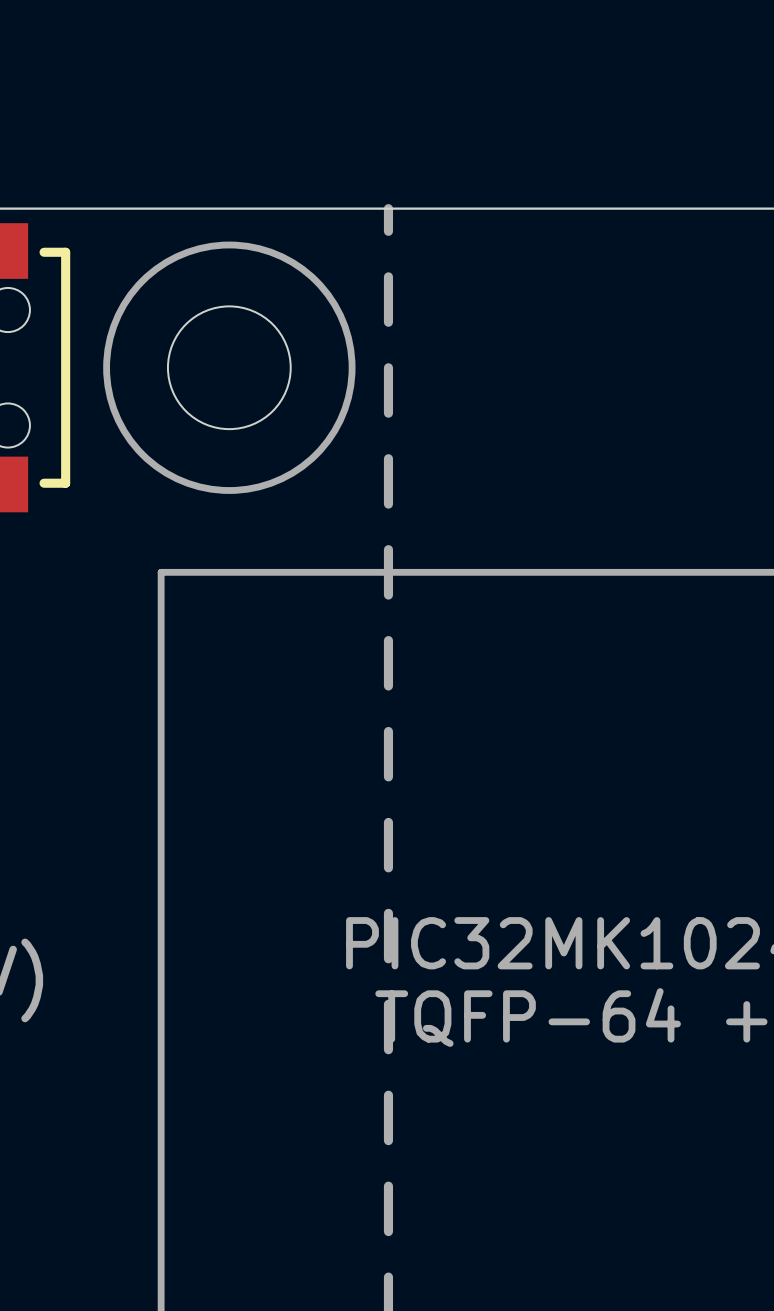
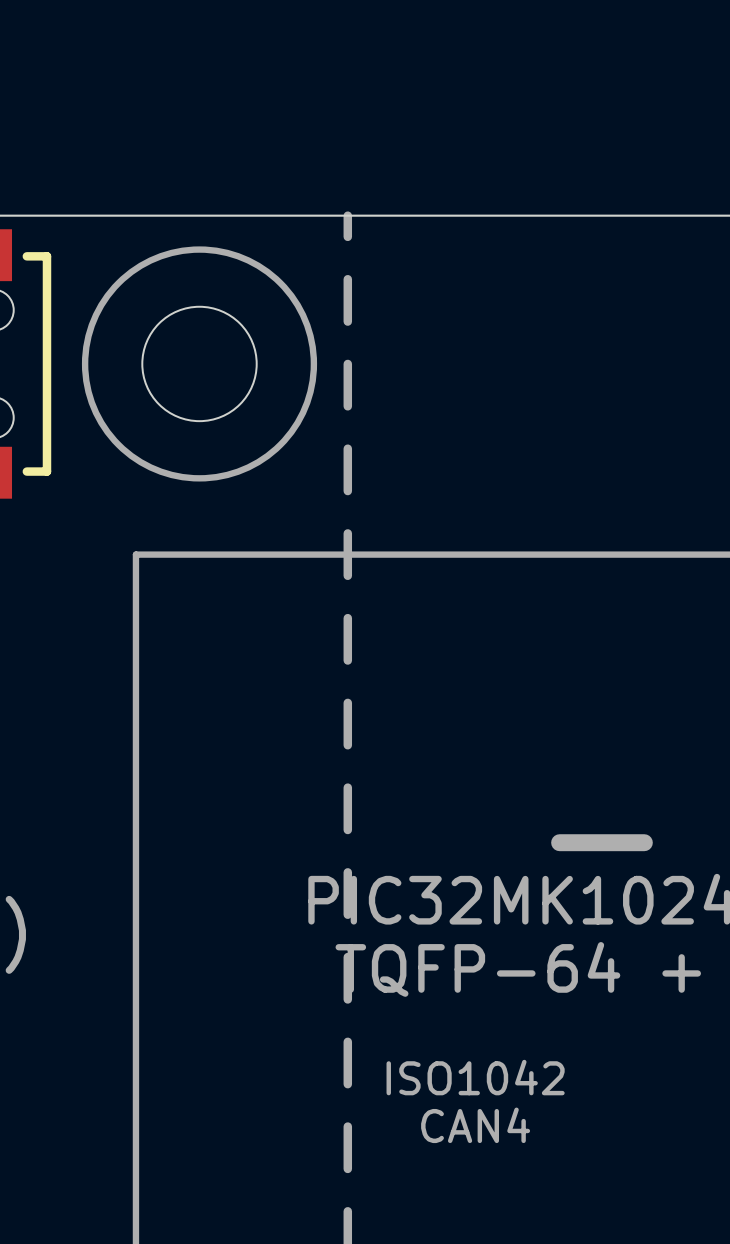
line: none -> (559, 842) (644, 842)
text: none -> ISO1042 (475, 1077)
text: none -> CAN4 (475, 1125)

